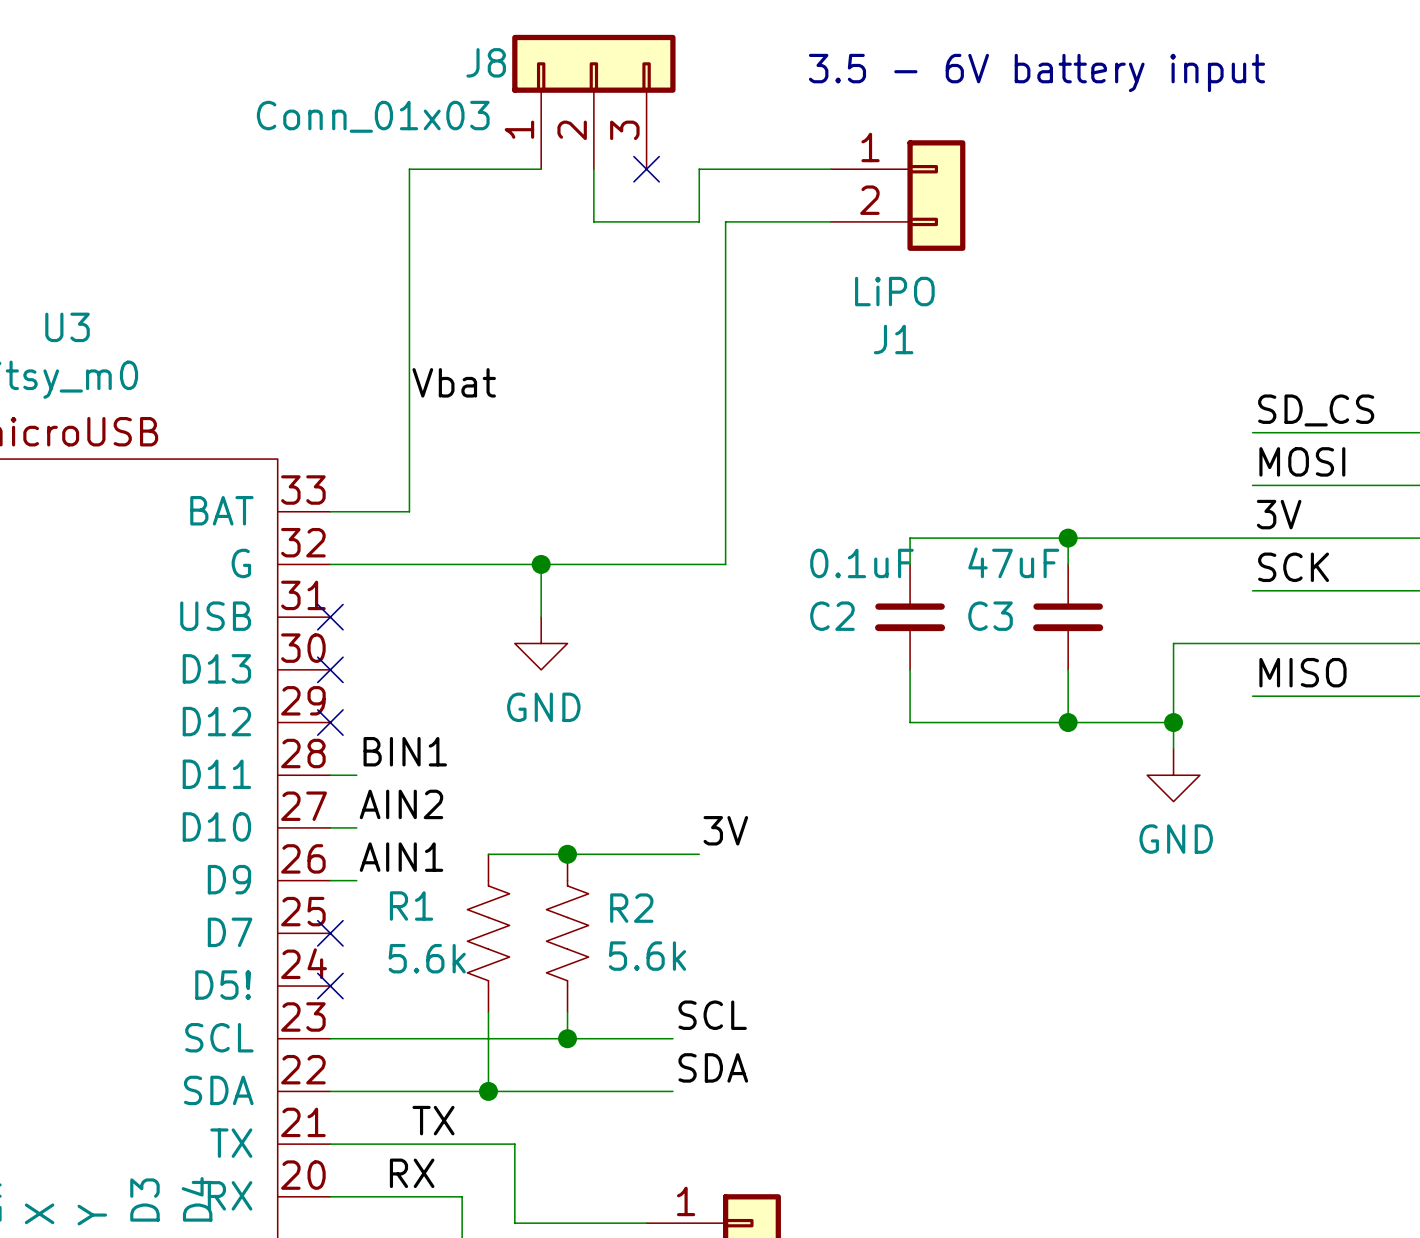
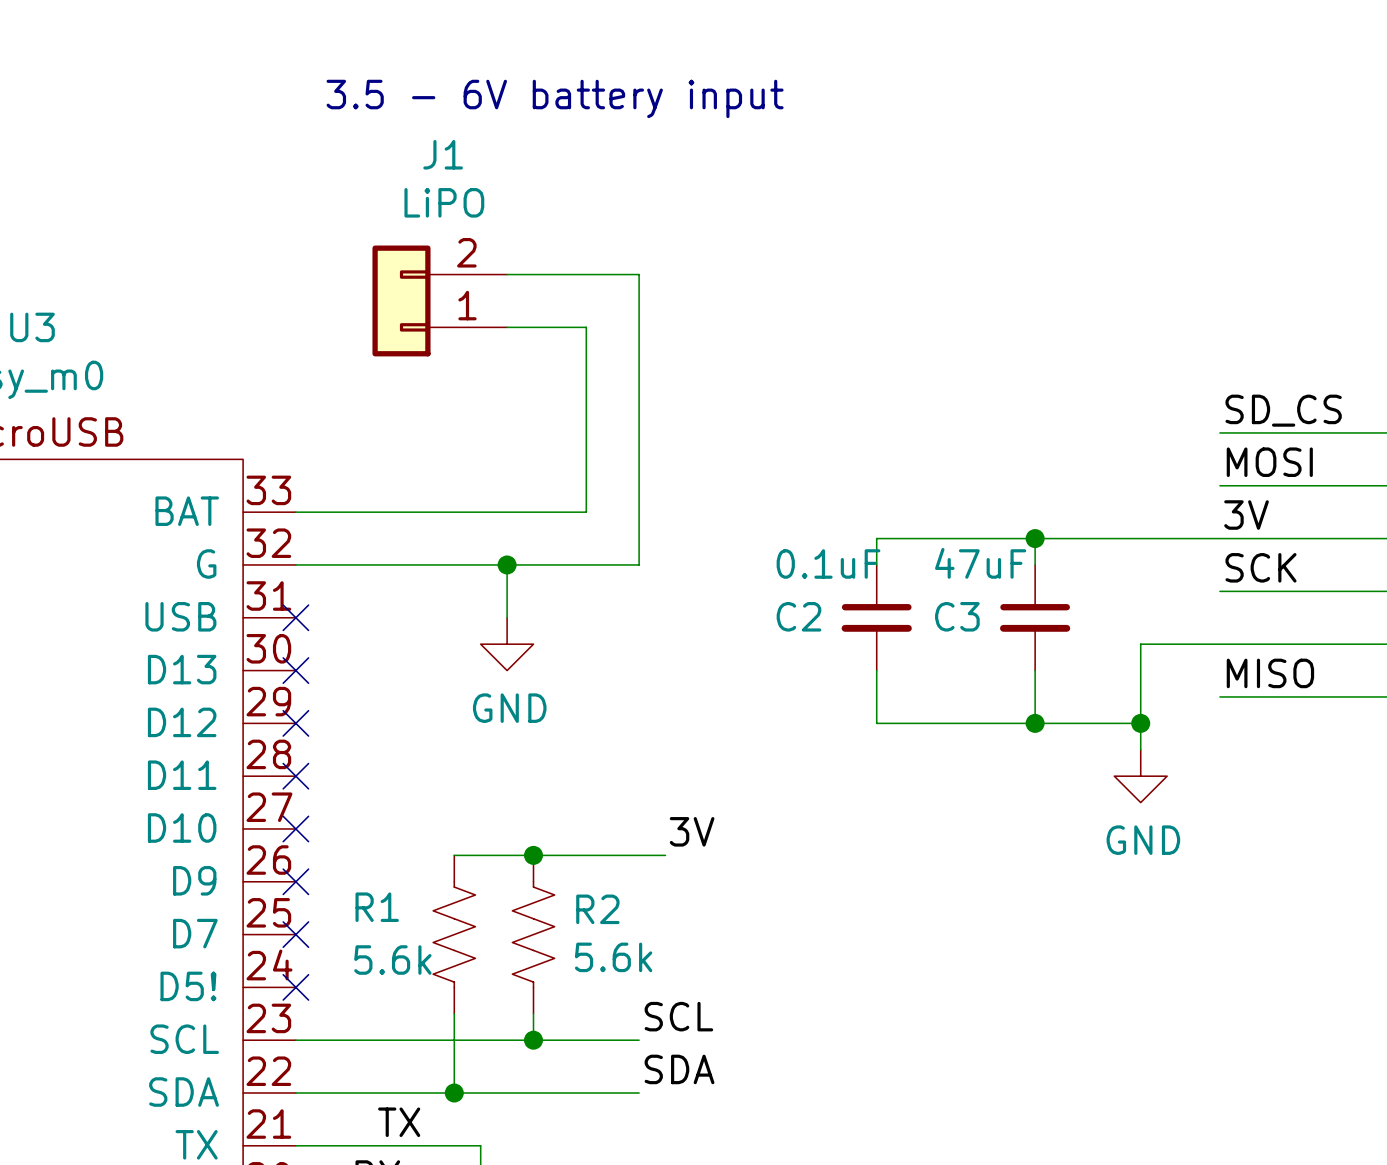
text position: 3.5 - 6V battery input (1036, 72) -> 3.5 - 6V battery input (555, 98)
J8: Conn_01x03 (593, 102) -> none
wire: (541, 169) (409, 169) (409, 511) -> (507, 327) (586, 327) (586, 512) (375, 512)
wire: (593, 169) (593, 221) (699, 221) (699, 169) (831, 169) -> none
no-connect mark: (646, 169) -> none
J1 position: (898, 195) -> (439, 300)
J1 rotation: 0° (936, 195) -> 180° (401, 300)
wire: (831, 221) (725, 221) (725, 564) (672, 564) -> (507, 274) (639, 274) (639, 564)
label: Vbat (454, 382) -> none
label: BIN1 (405, 751) -> none
wire: (330, 775) (356, 775) -> none
no-connect mark: none -> (295, 776)
label: AIN2 (401, 804) -> none
wire: (330, 827) (356, 827) -> none
no-connect mark: none -> (295, 828)
label: AIN1 (401, 857) -> none
wire: (330, 880) (356, 880) -> none
no-connect mark: none -> (295, 881)

